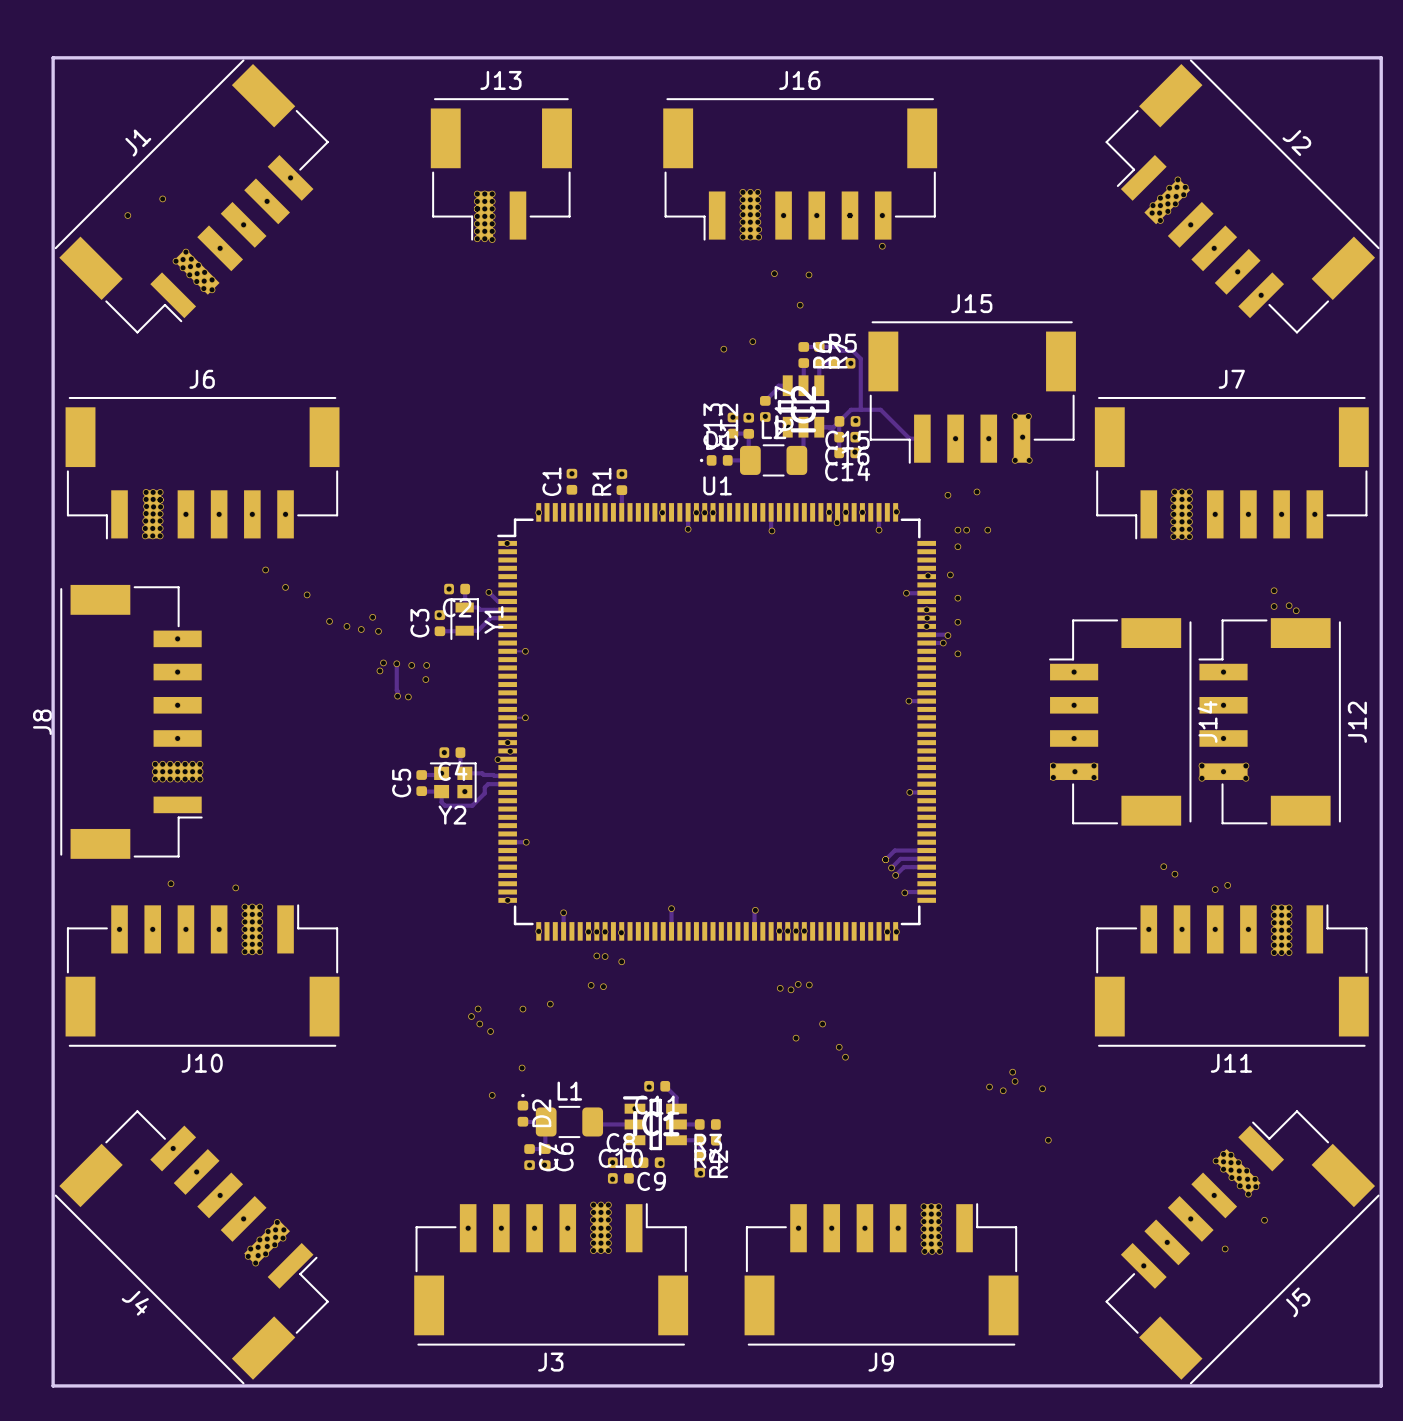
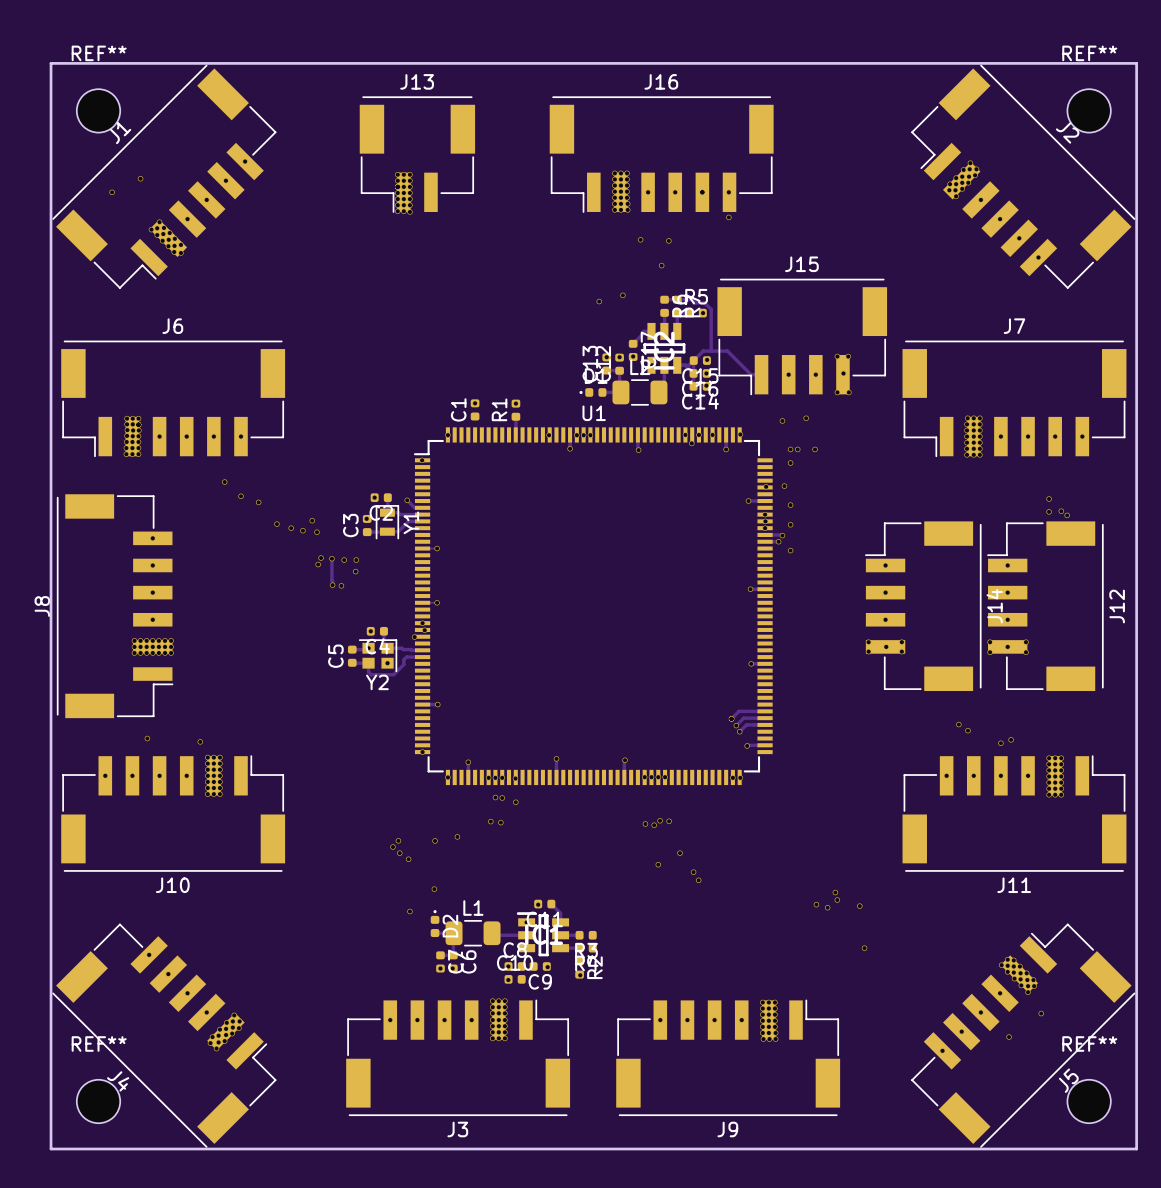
REF**: none -> (98, 110)
REF**: none -> (1089, 110)
REF**: none -> (98, 1101)
REF**: none -> (1089, 1101)

